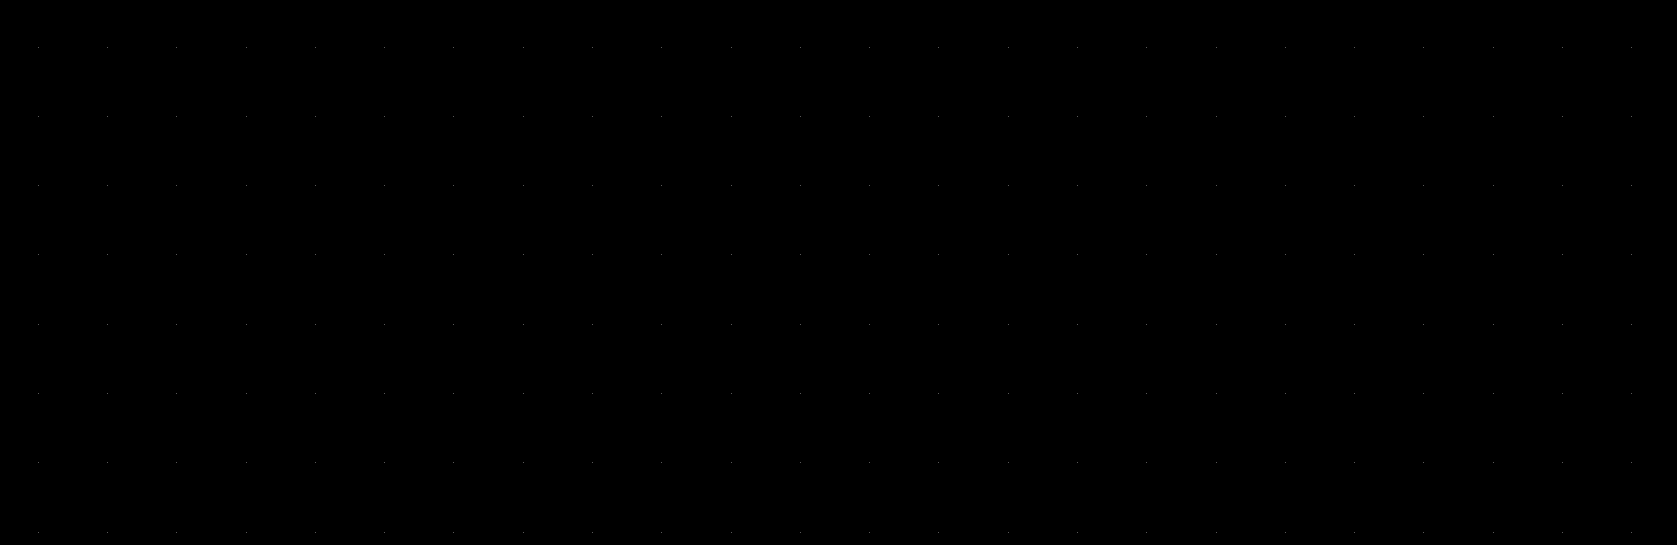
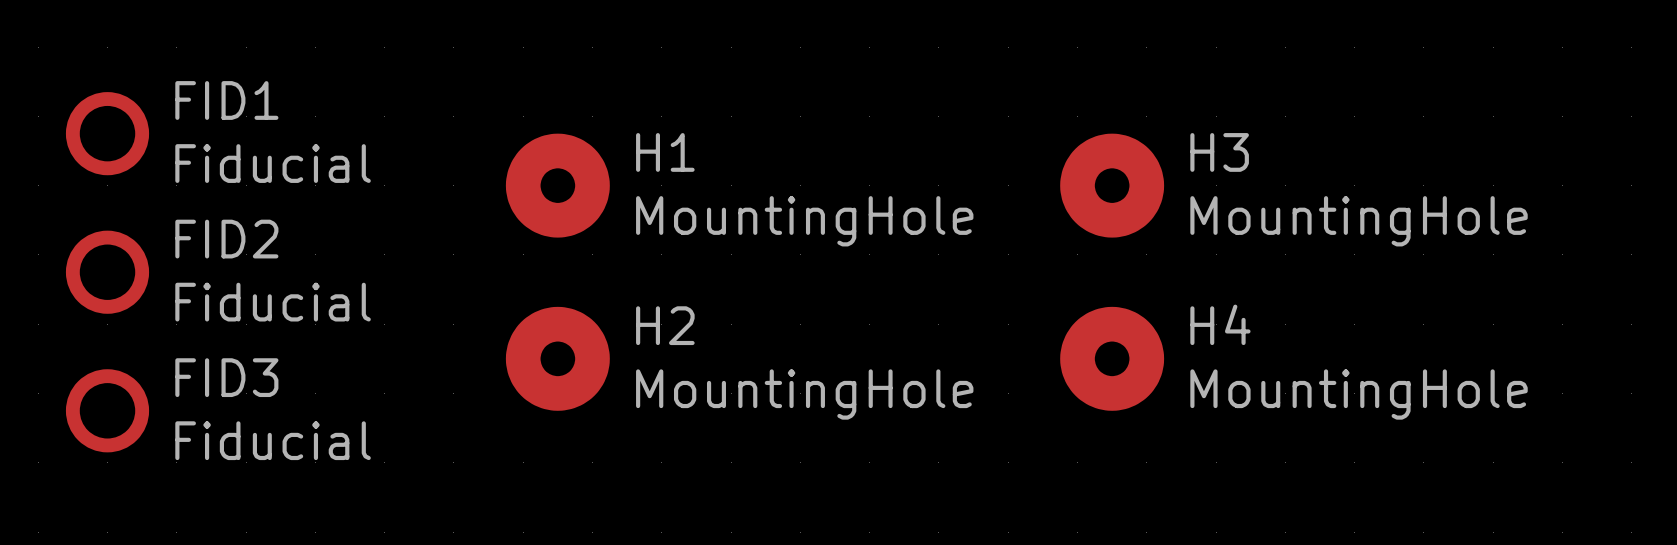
FID1: none -> Fiducial (107, 133)
H1: none -> MountingHole (557, 185)
H3: none -> MountingHole (1112, 185)
FID2: none -> Fiducial (107, 272)
H2: none -> MountingHole (557, 358)
H4: none -> MountingHole (1112, 358)
FID3: none -> Fiducial (107, 410)

